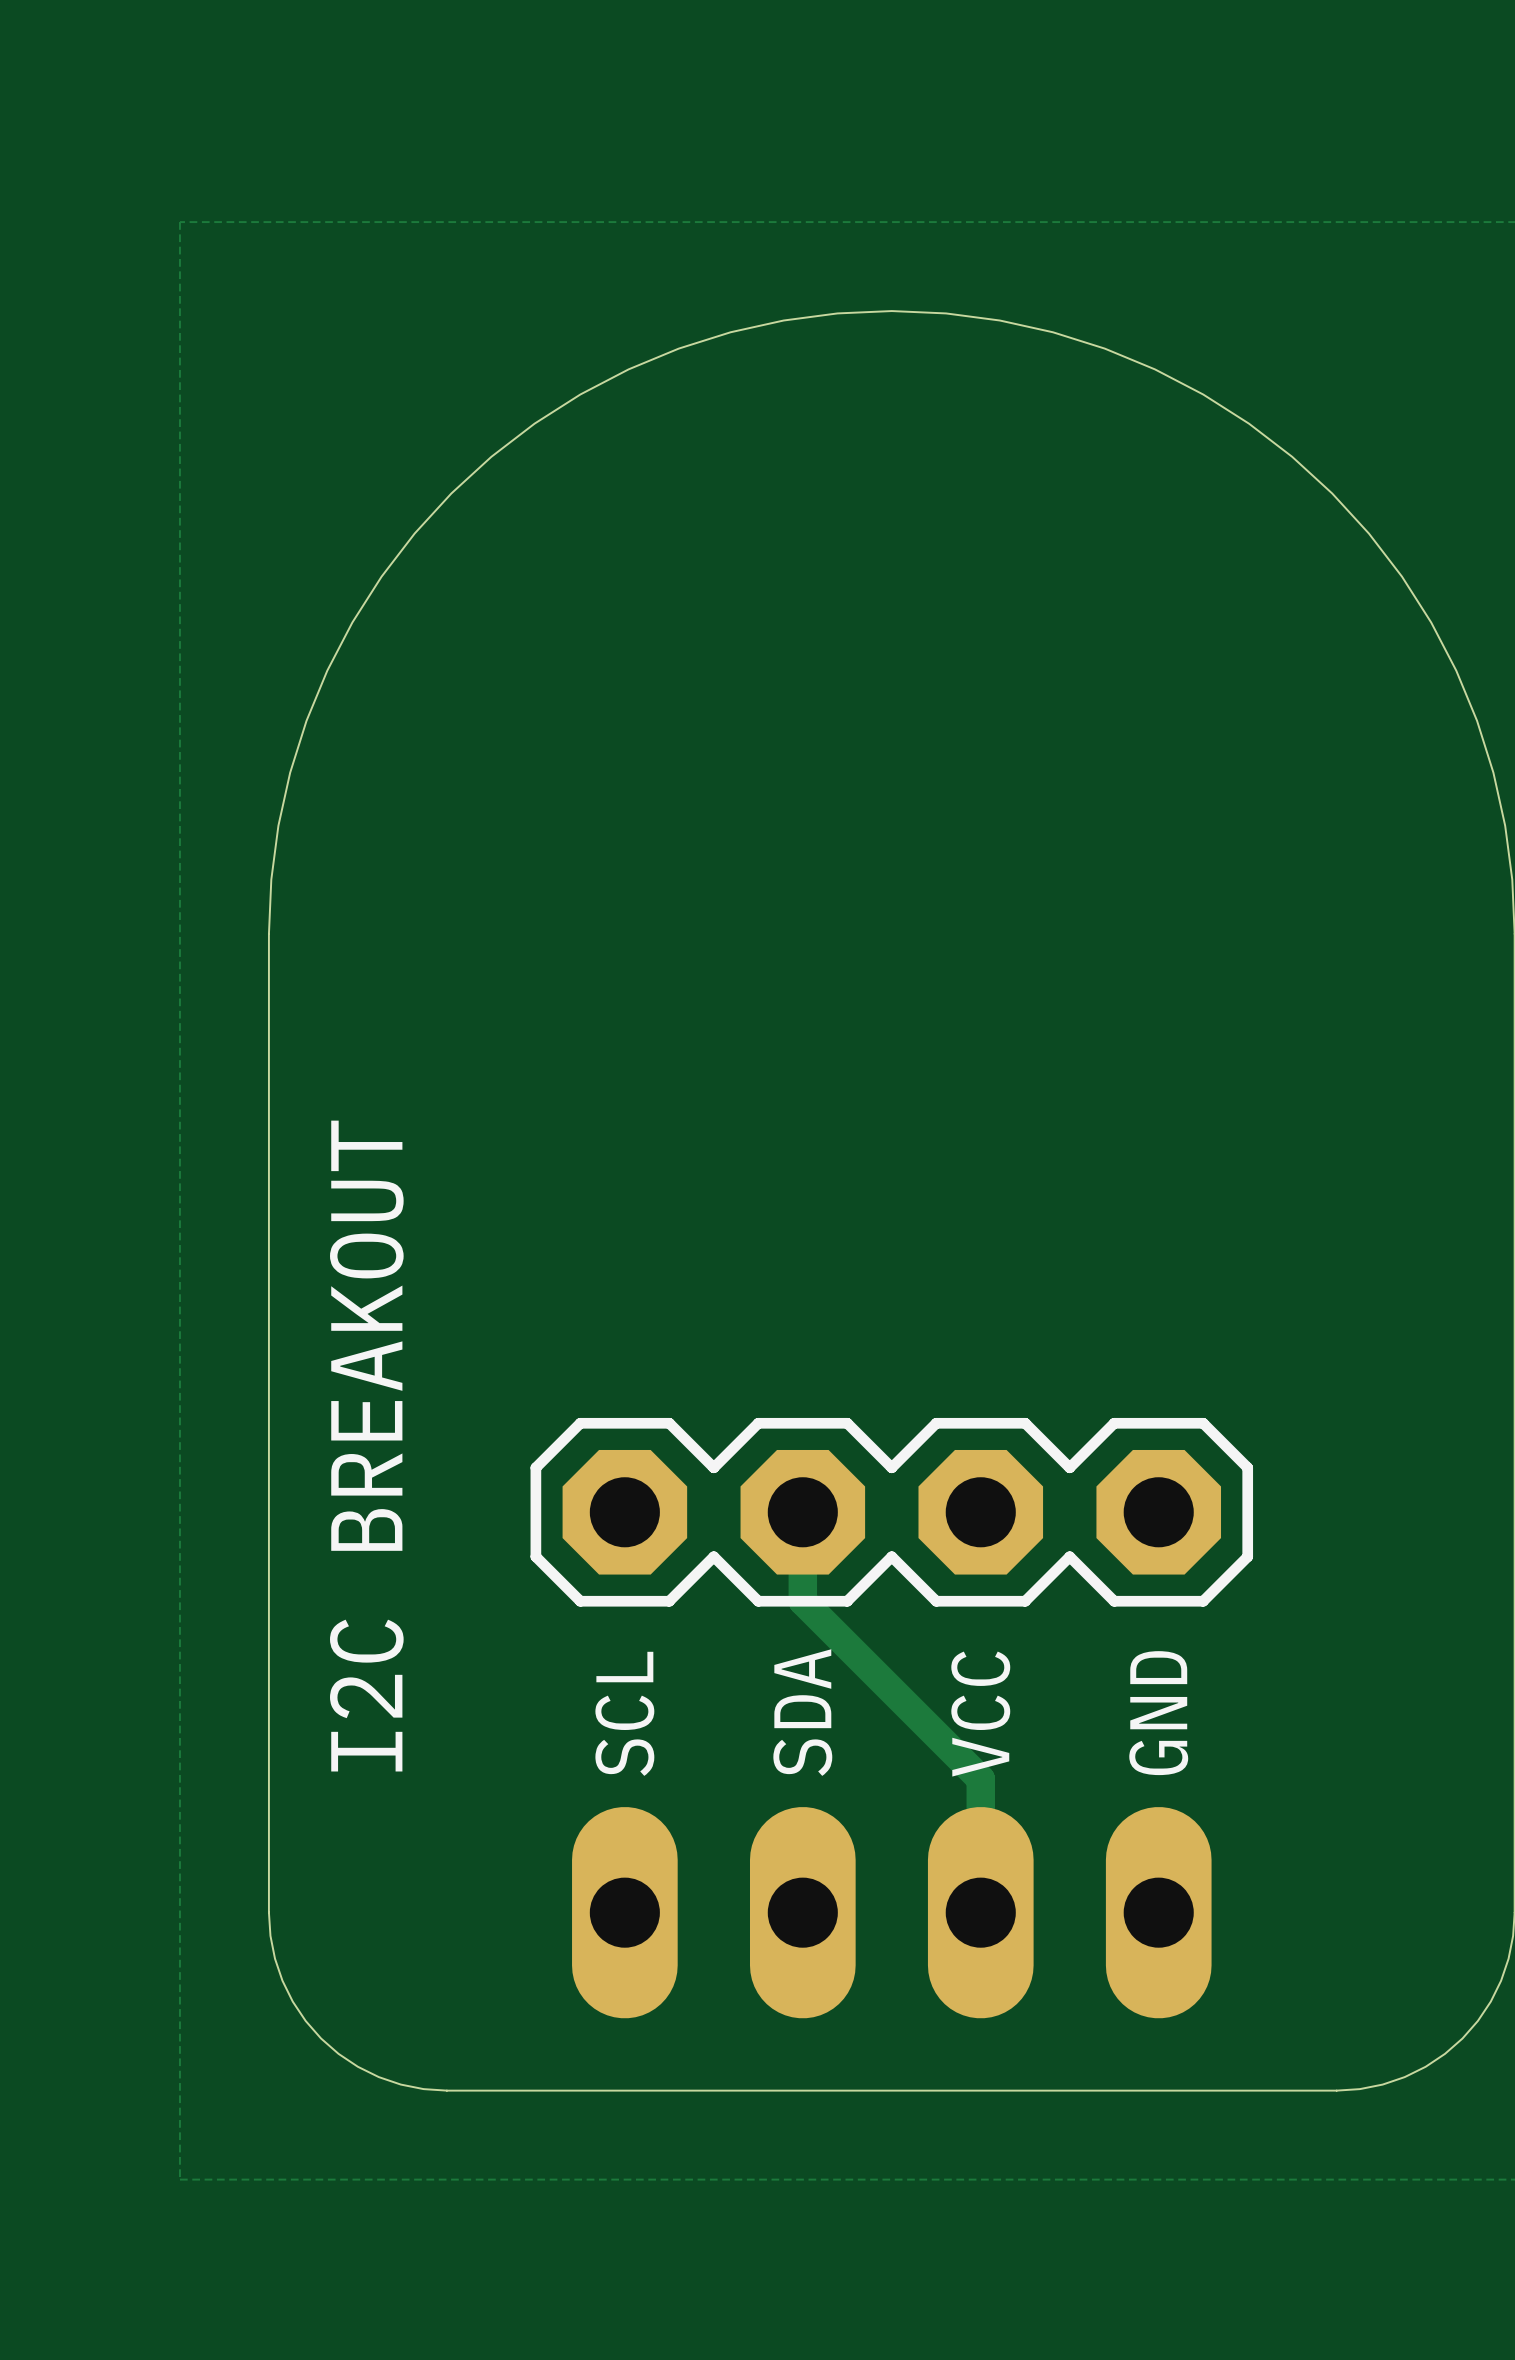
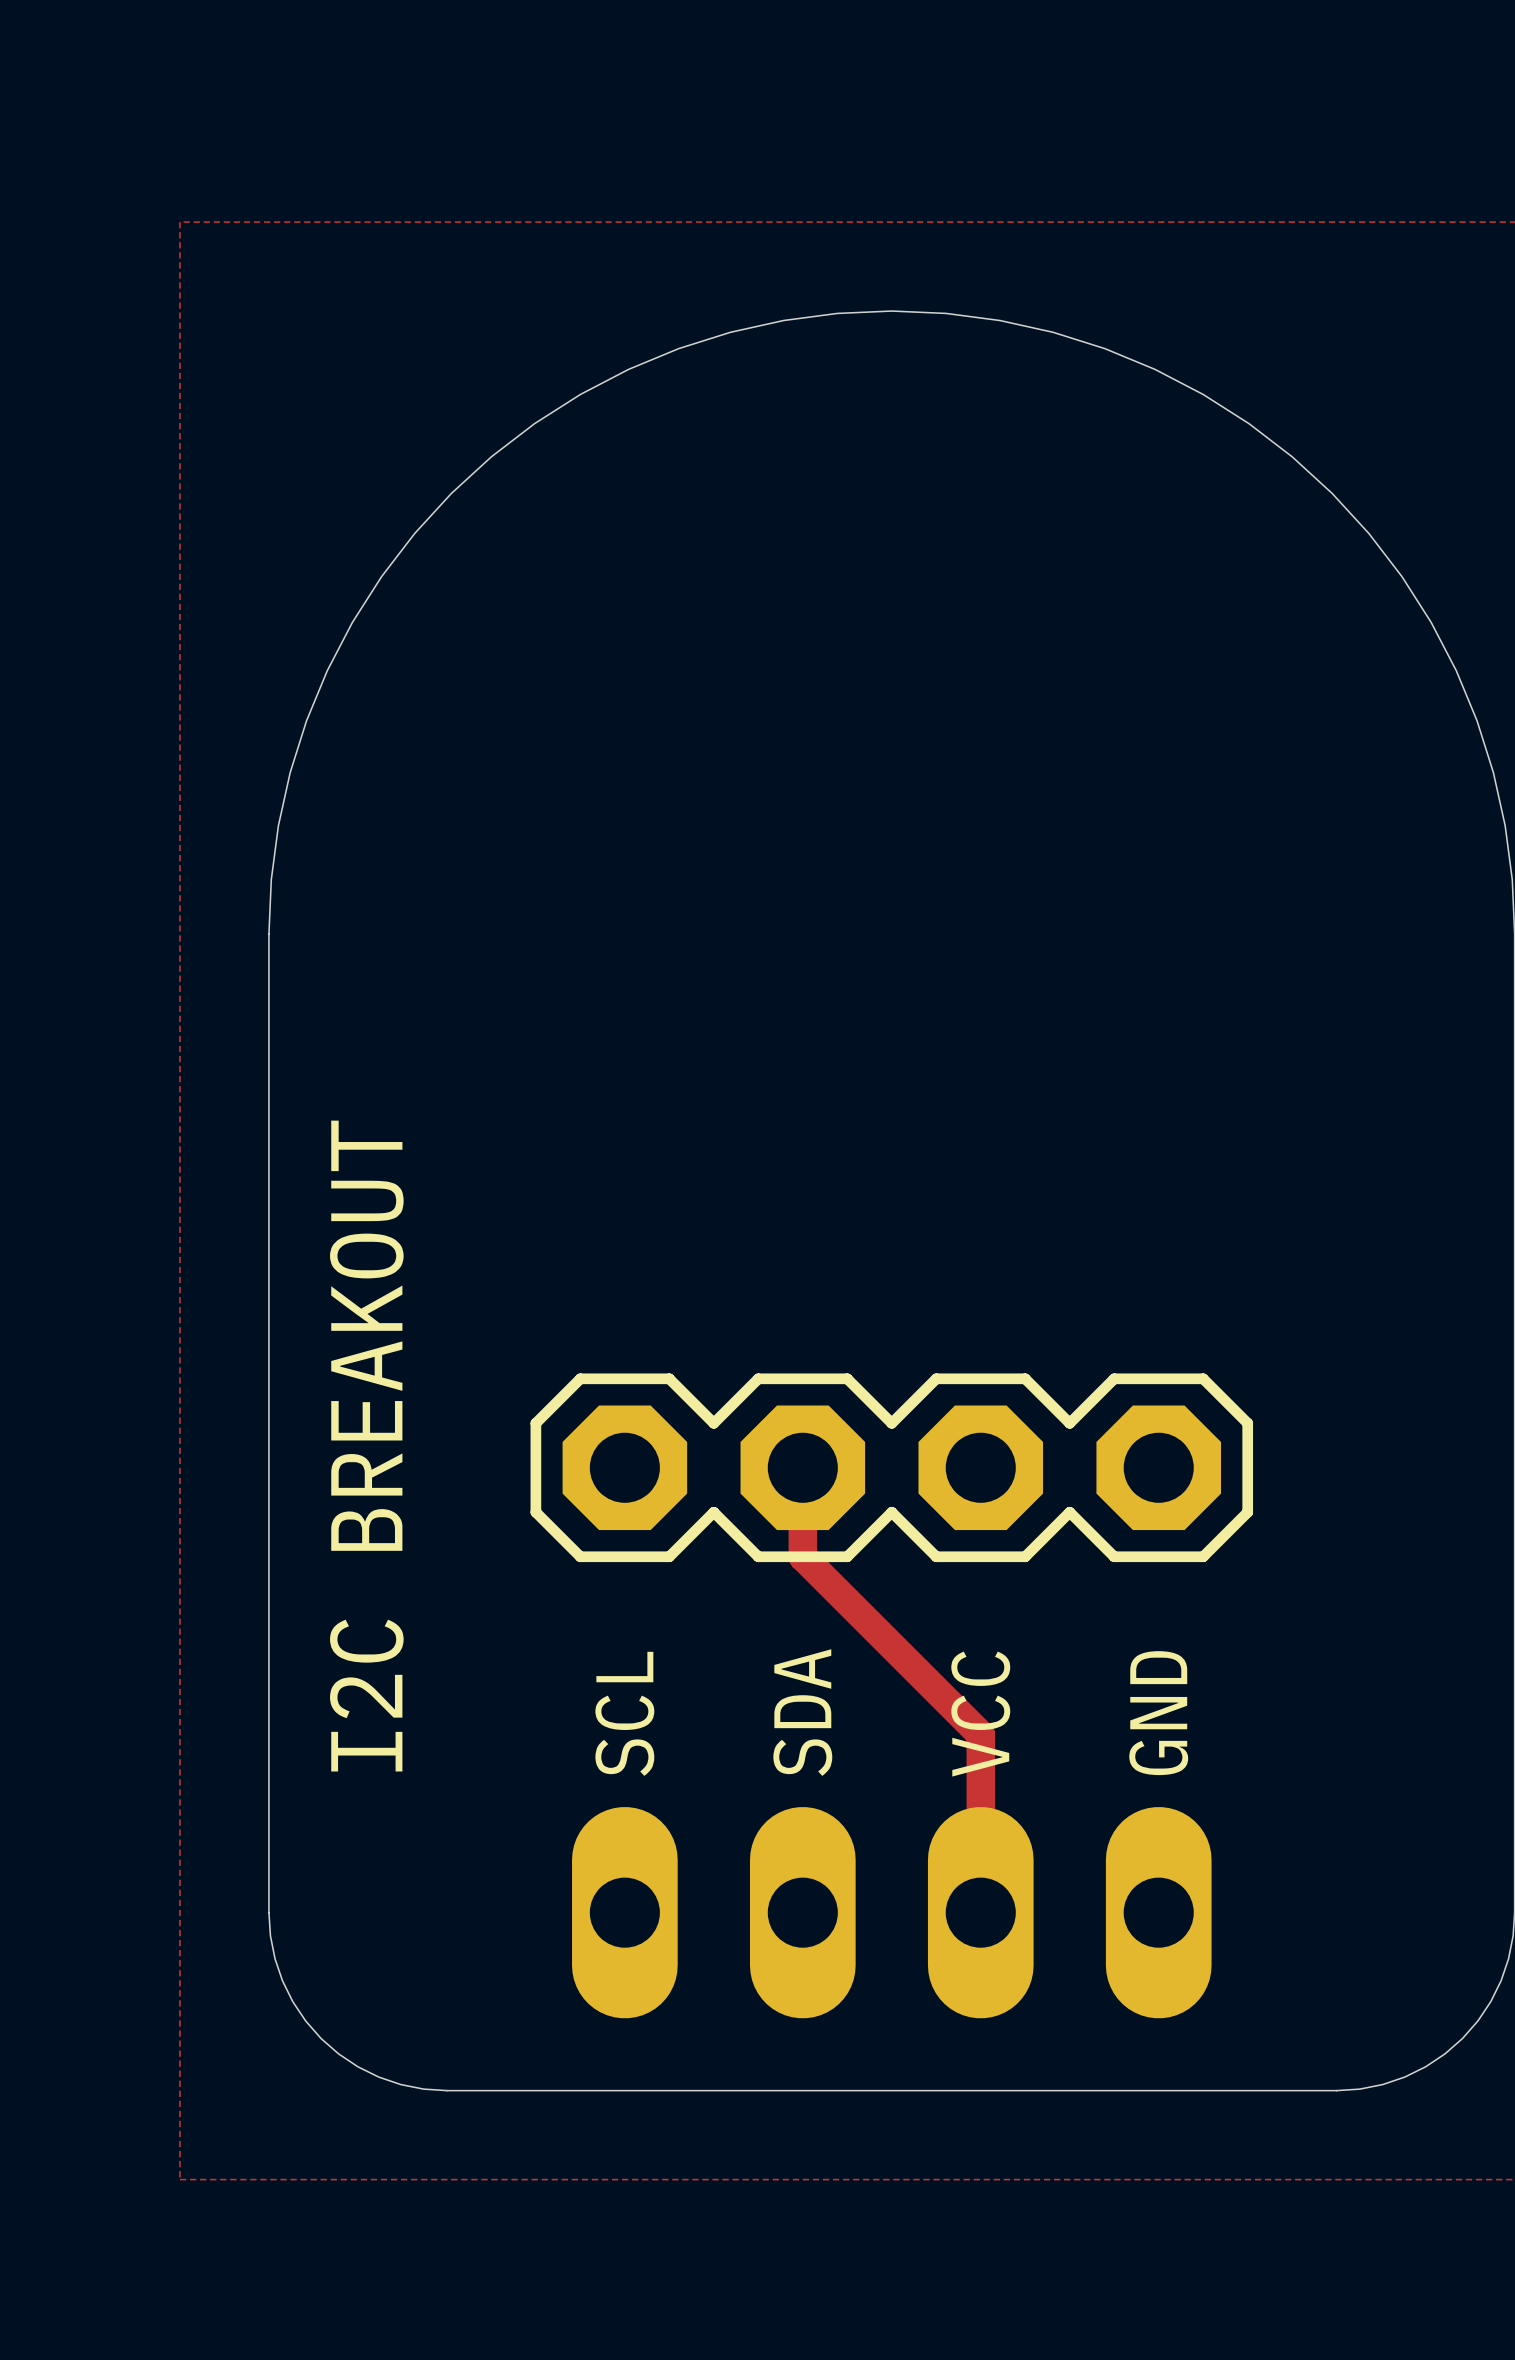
part position: (891, 1512) -> (891, 1467)
track: (802, 1556) (802, 1601) (980, 1779) -> (802, 1556) (980, 1734) (980, 1779)

